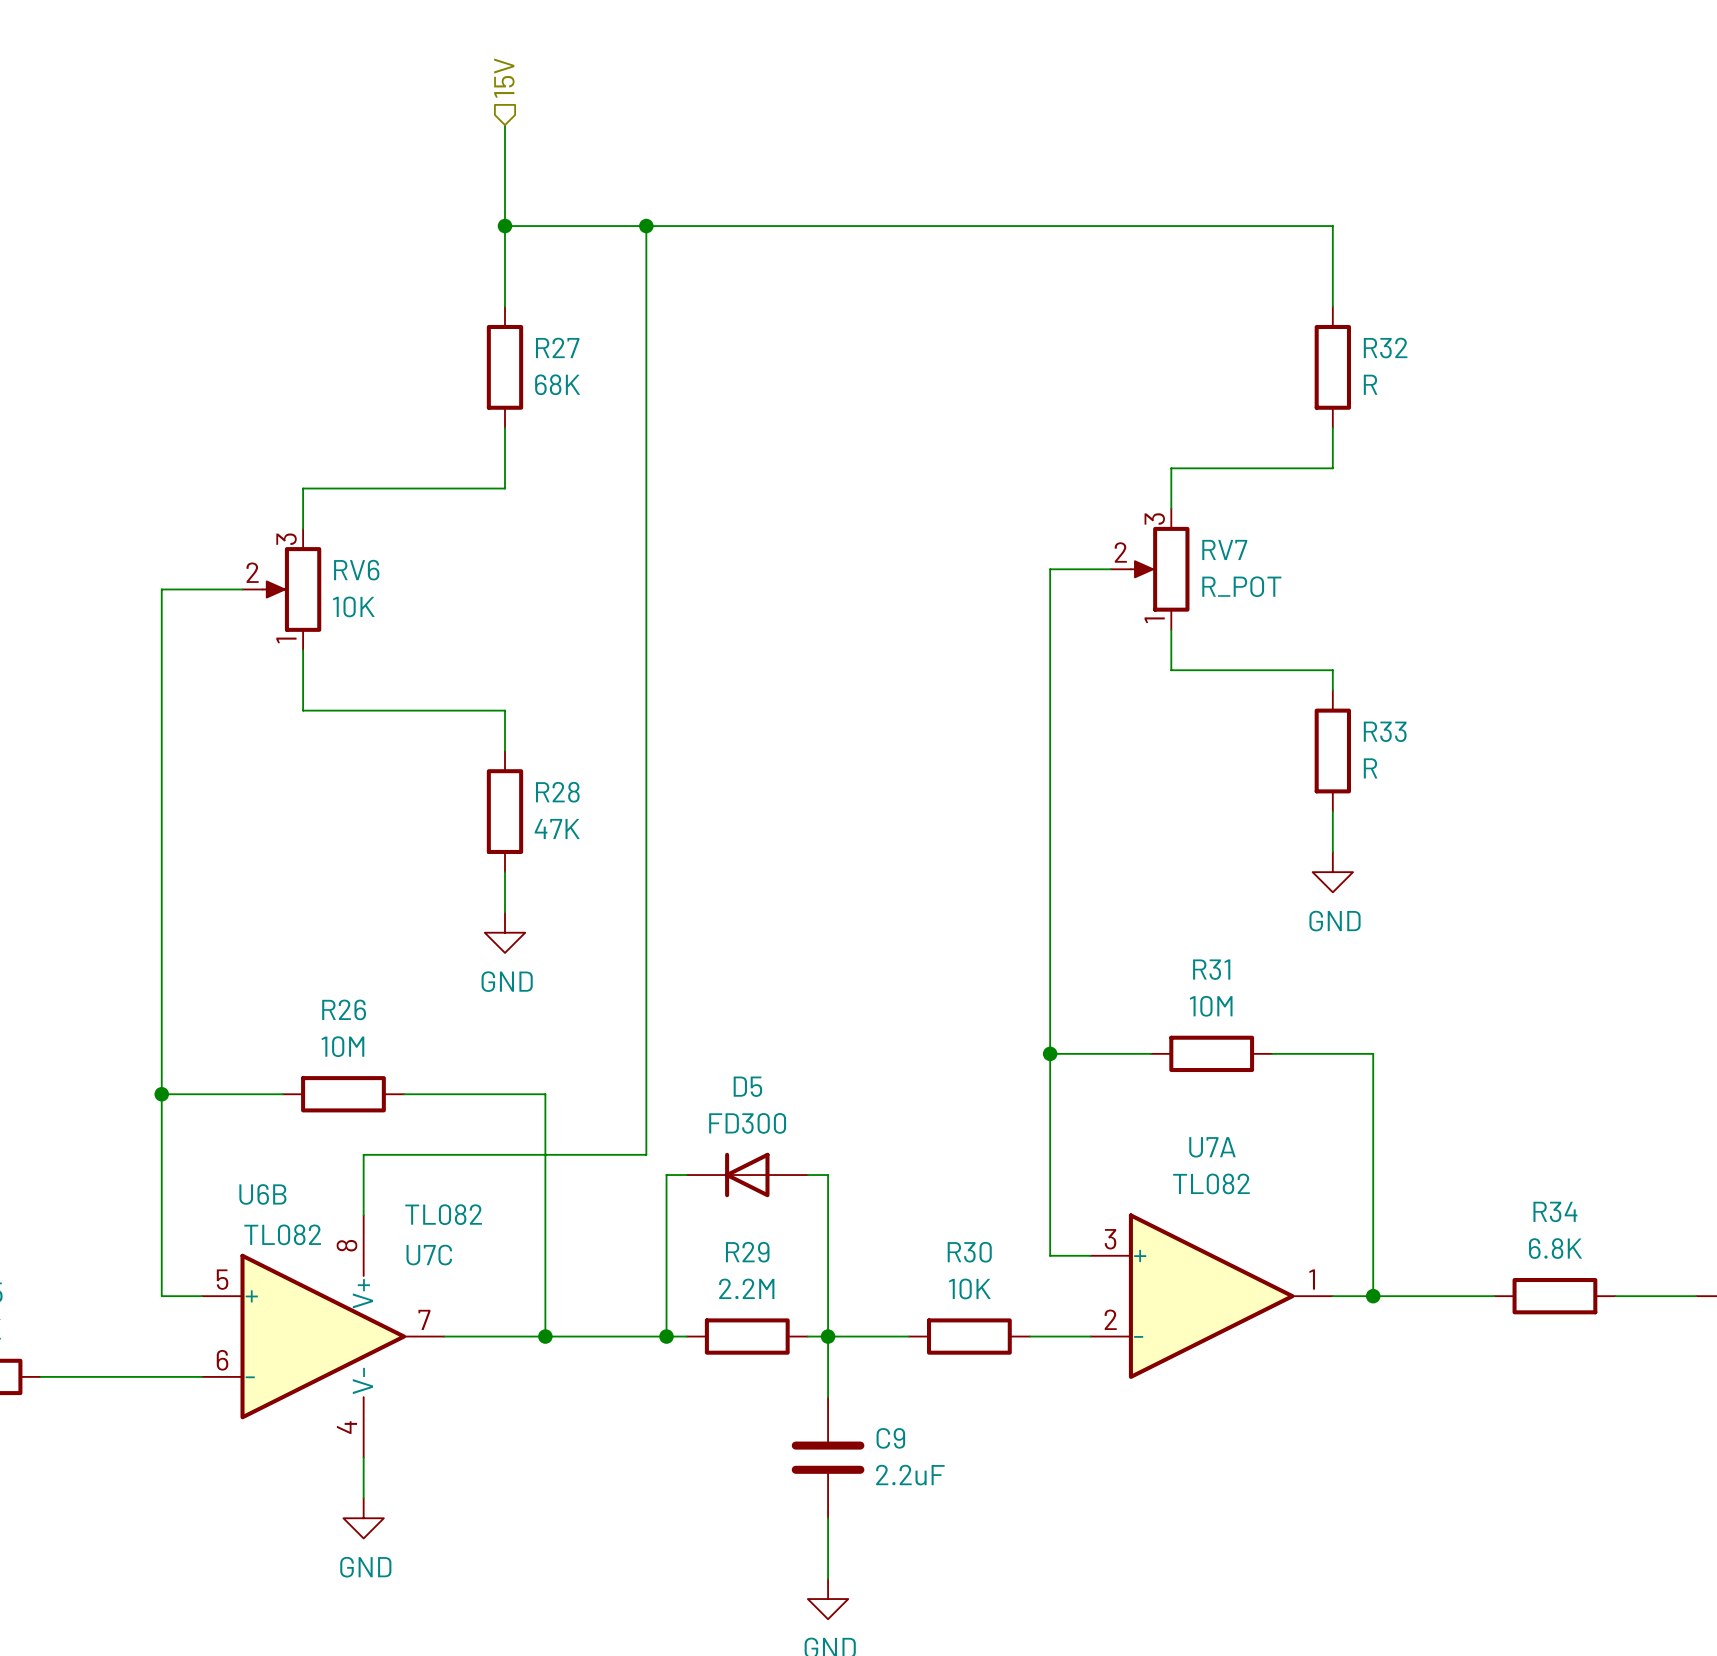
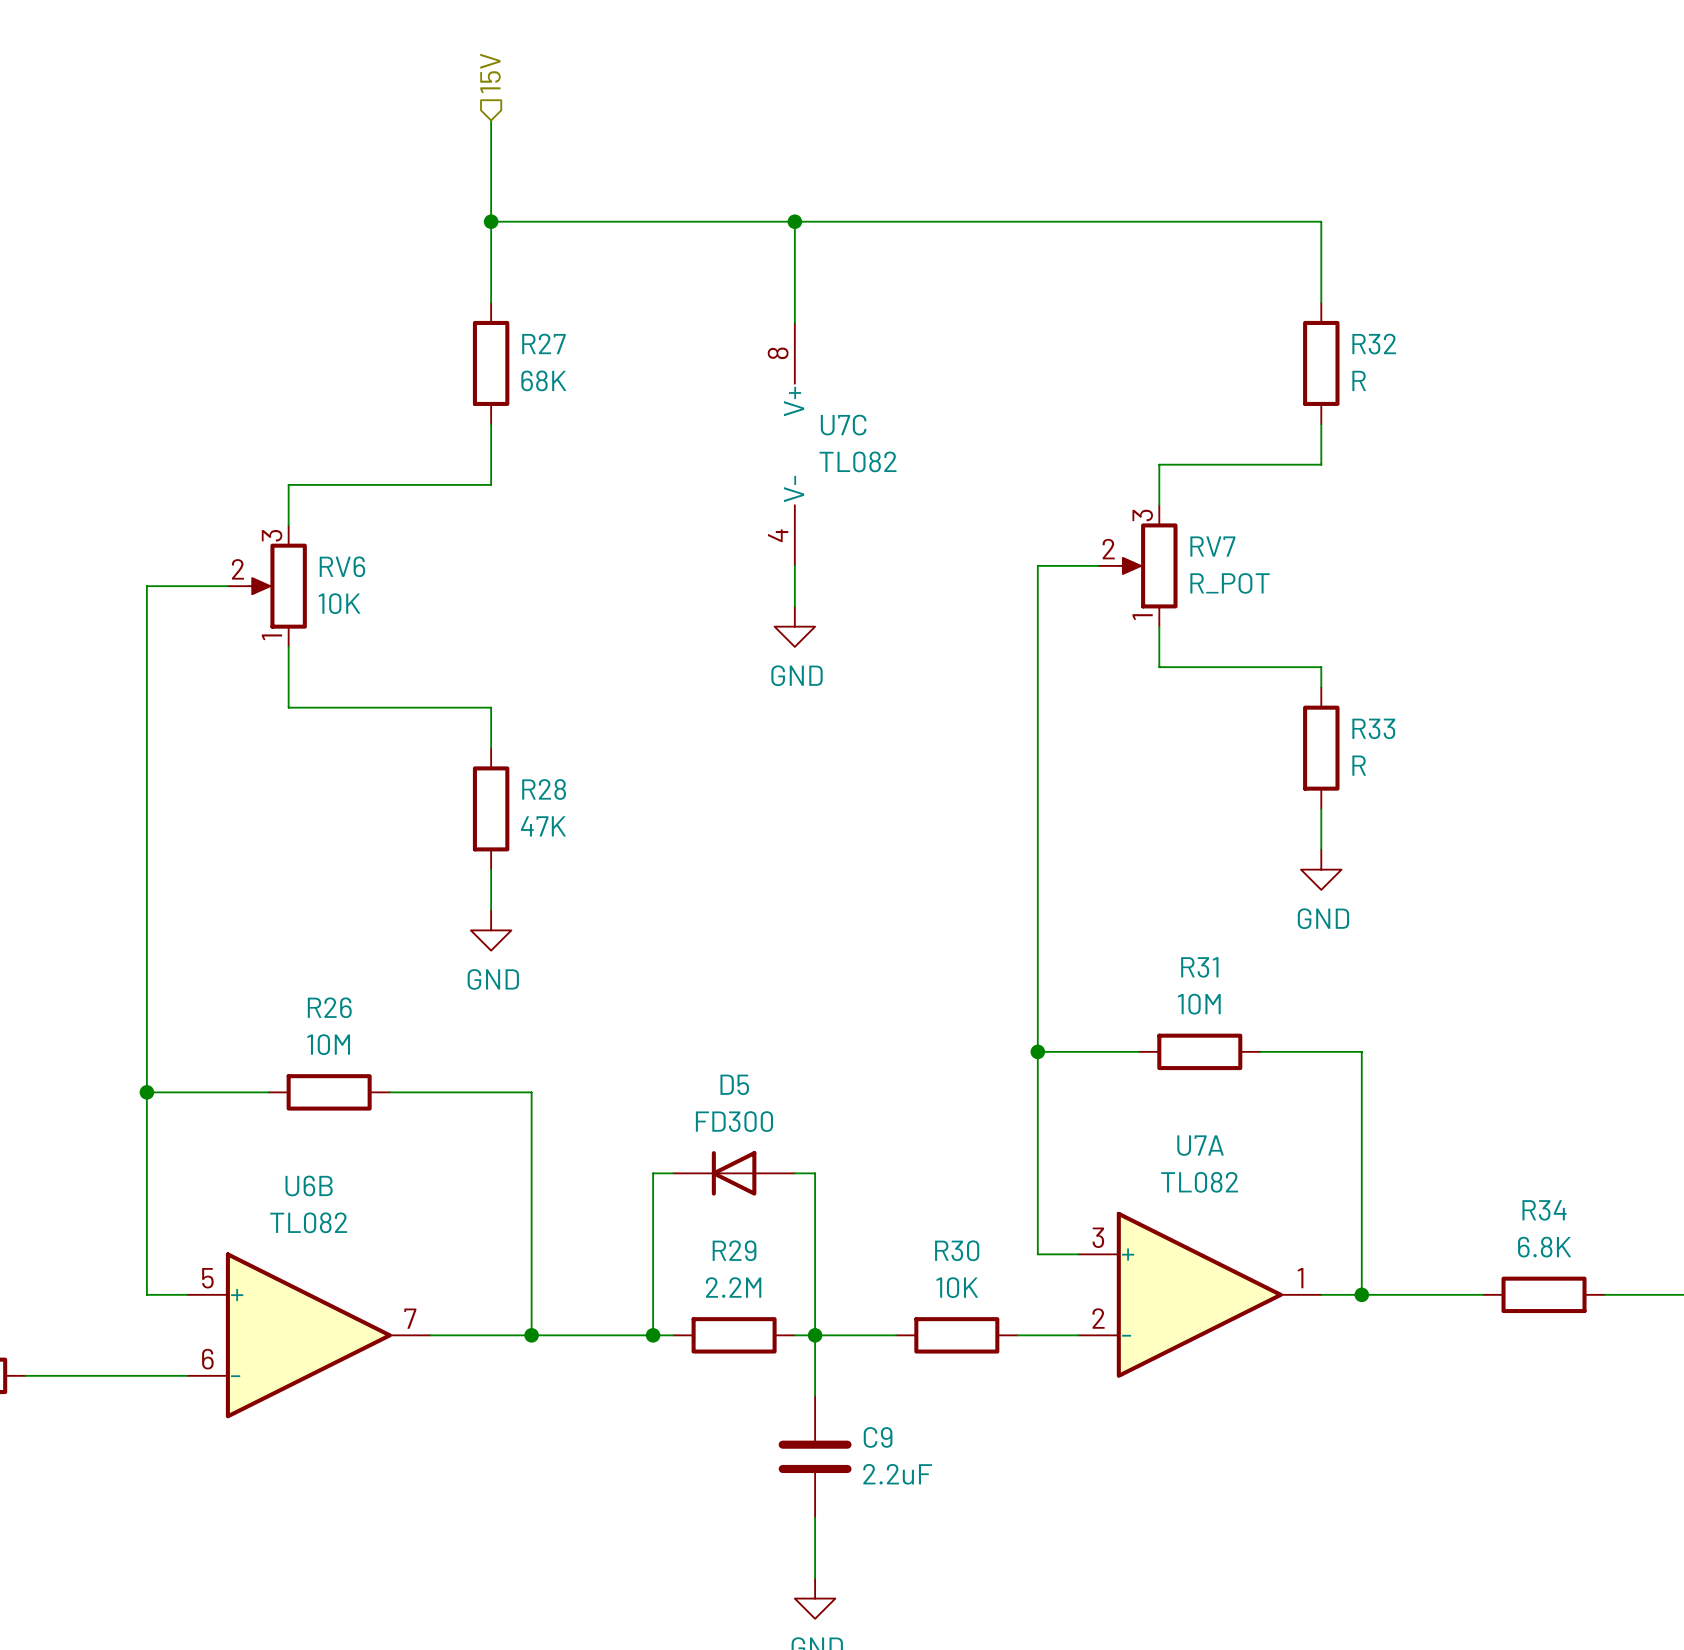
wire: (646, 226) (646, 1154) (363, 1154) (363, 1215) -> none
junction: (646, 226) -> none
wire: none -> (794, 221) (794, 322)
junction: none -> (794, 221)
wire: none -> (794, 565) (794, 606)
power symbol: none -> GND (794, 626)
U6B name position: U6B (262, 1194) -> U6B (309, 1185)
U7C value position: TL082 (443, 1214) -> TL082 (858, 461)
U6B value position: TL082 (282, 1234) -> TL082 (308, 1222)
U7C name position: U7C (429, 1255) -> U7C (843, 425)
U7C position: (363, 1336) -> (794, 444)
wire: (363, 1457) (363, 1498) -> none
power symbol: GND (363, 1518) -> none

